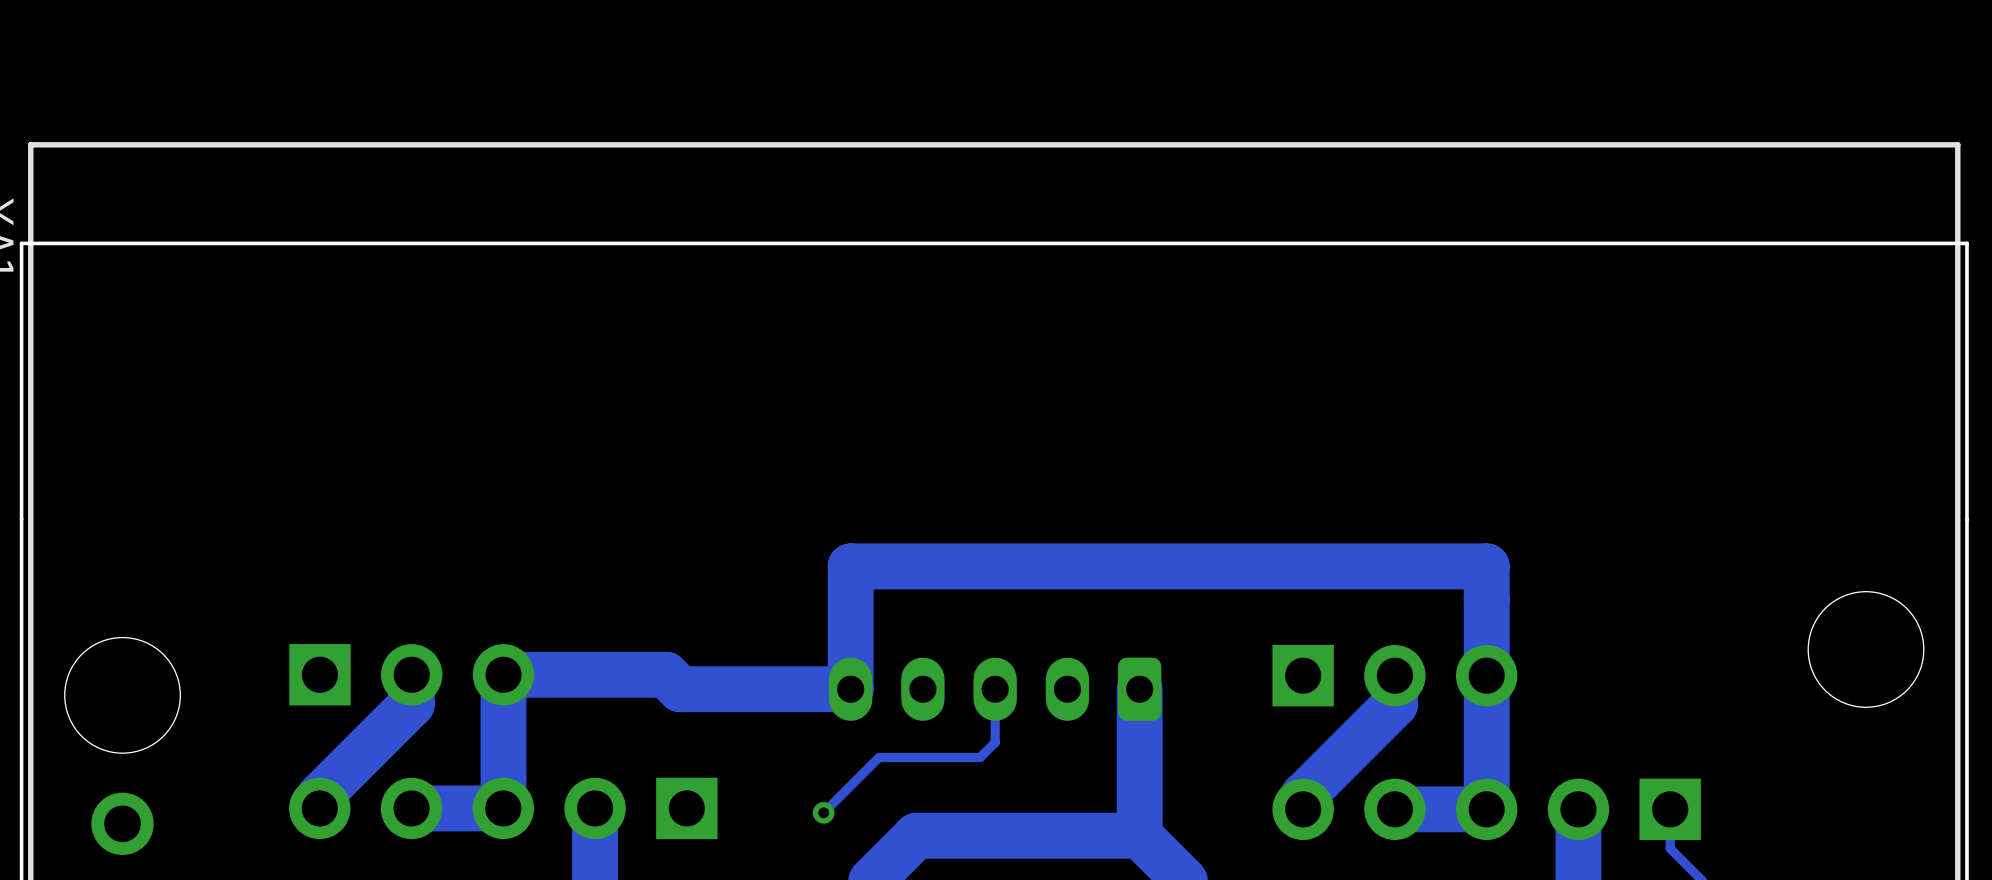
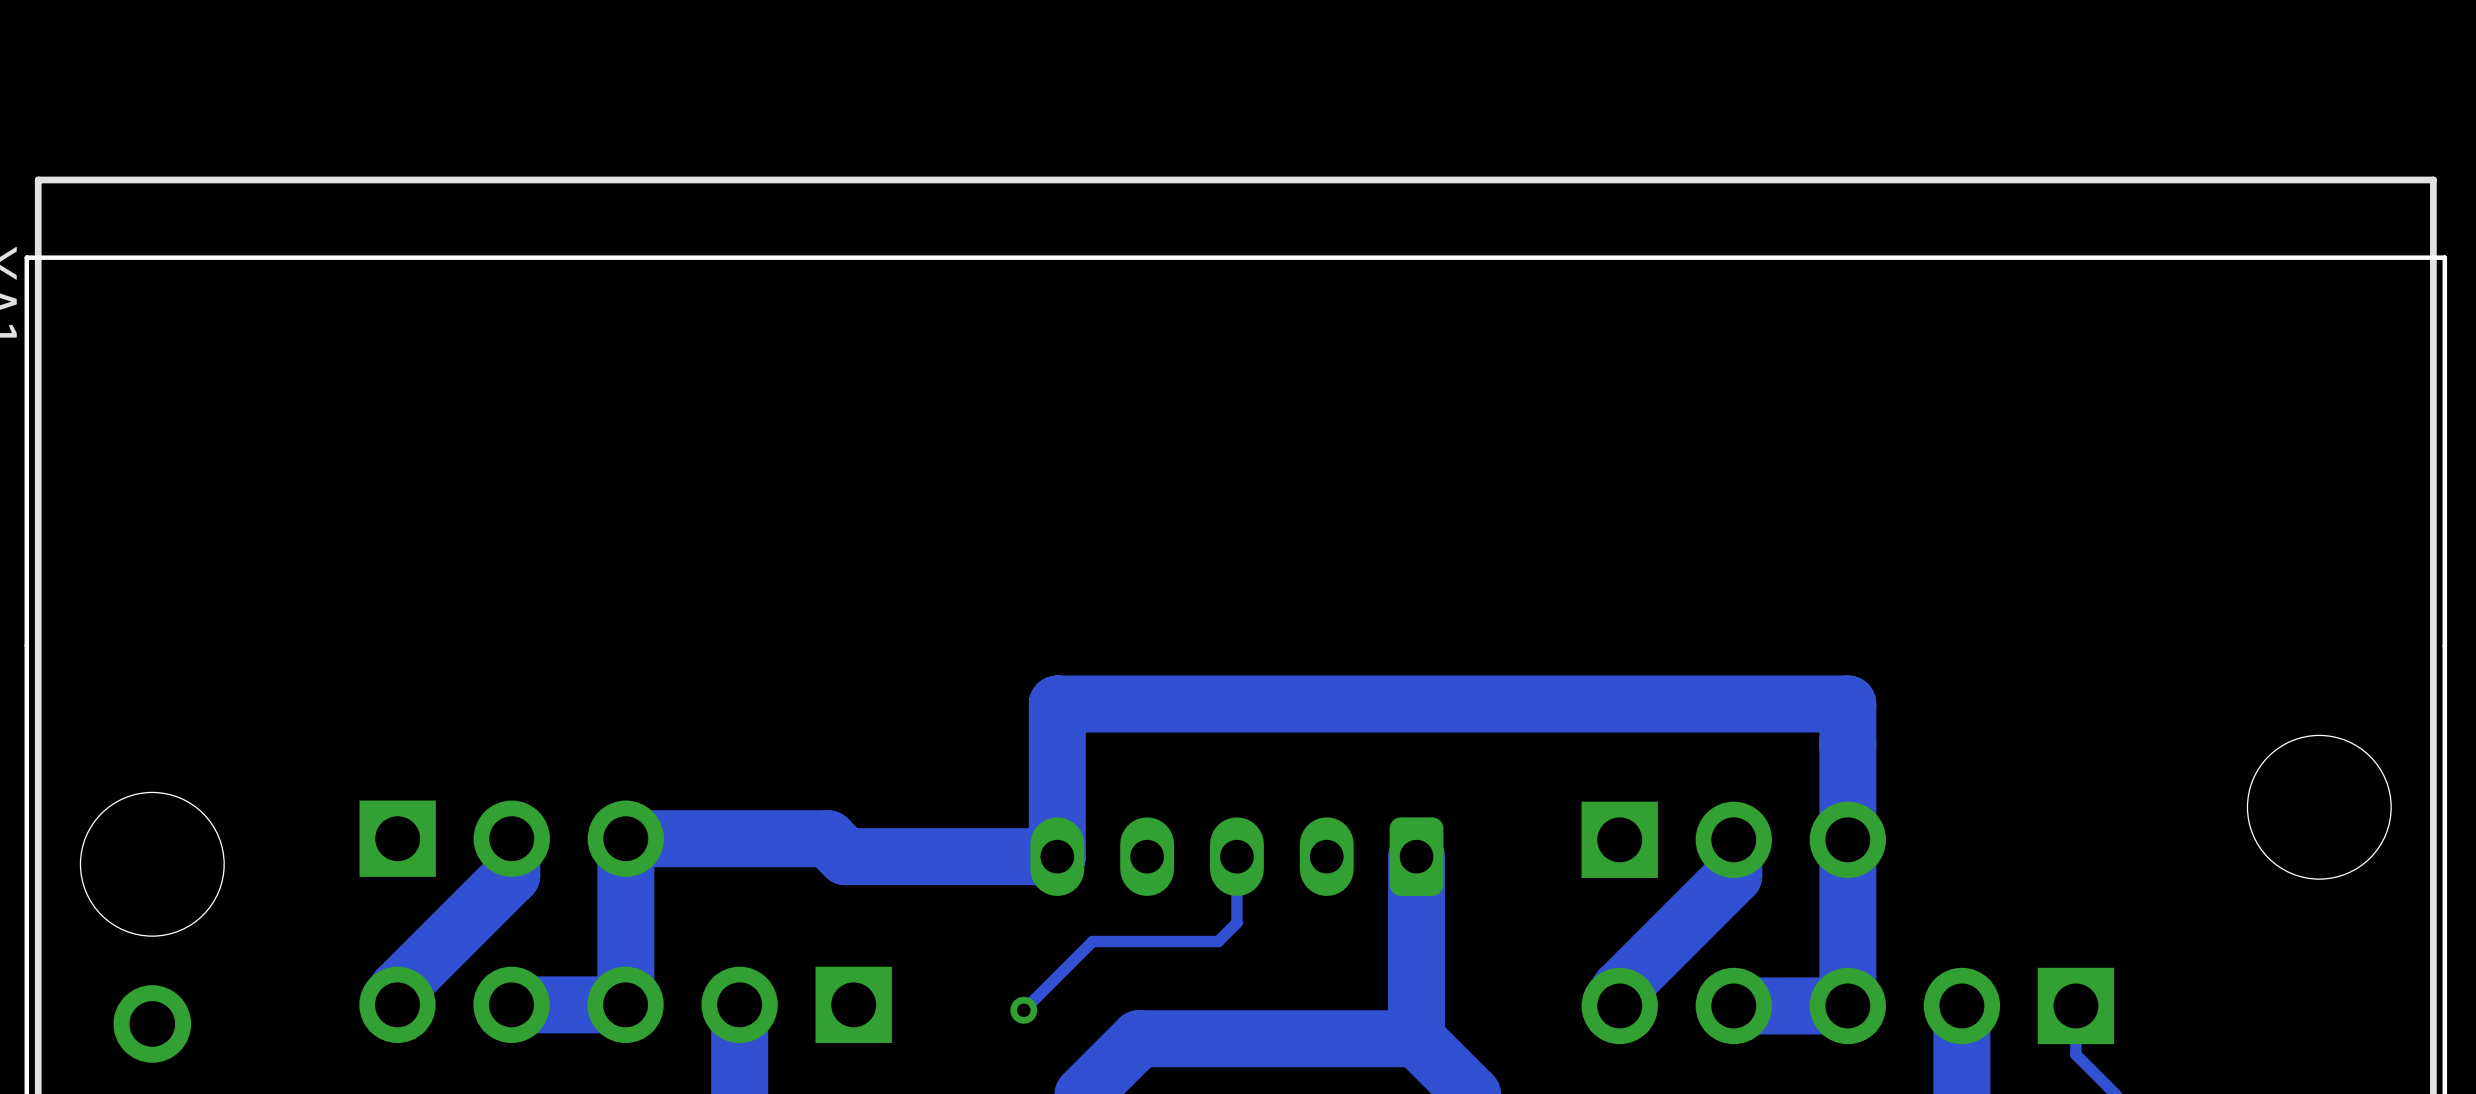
board edge: (1966, 243) (21, 243) -> (2444, 302) (2444, 257) (26, 257) (26, 302)

